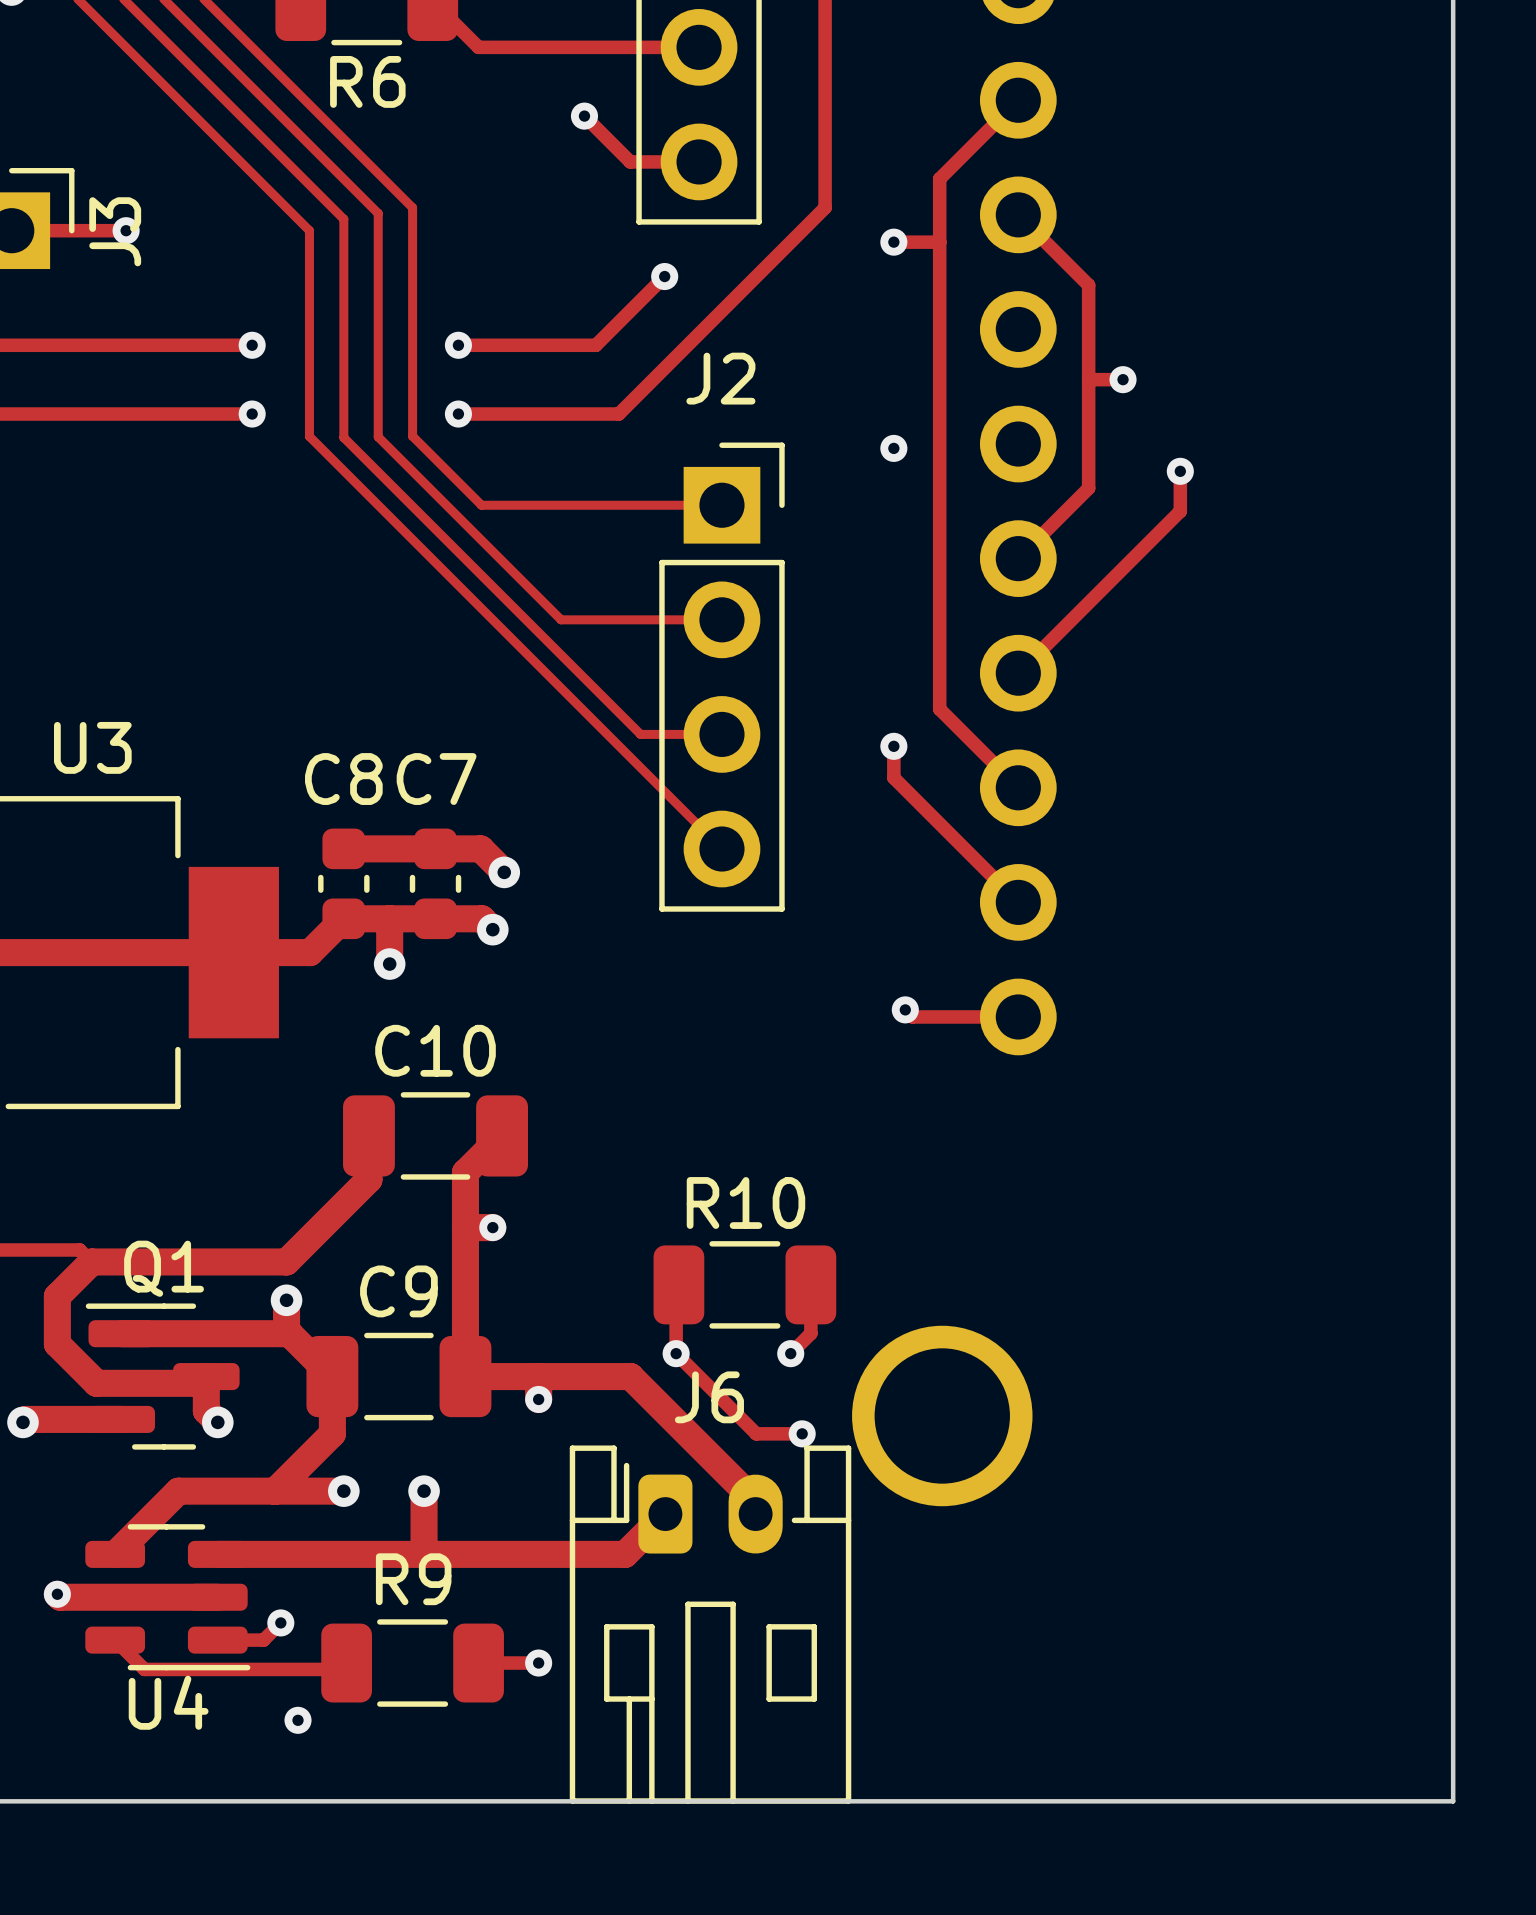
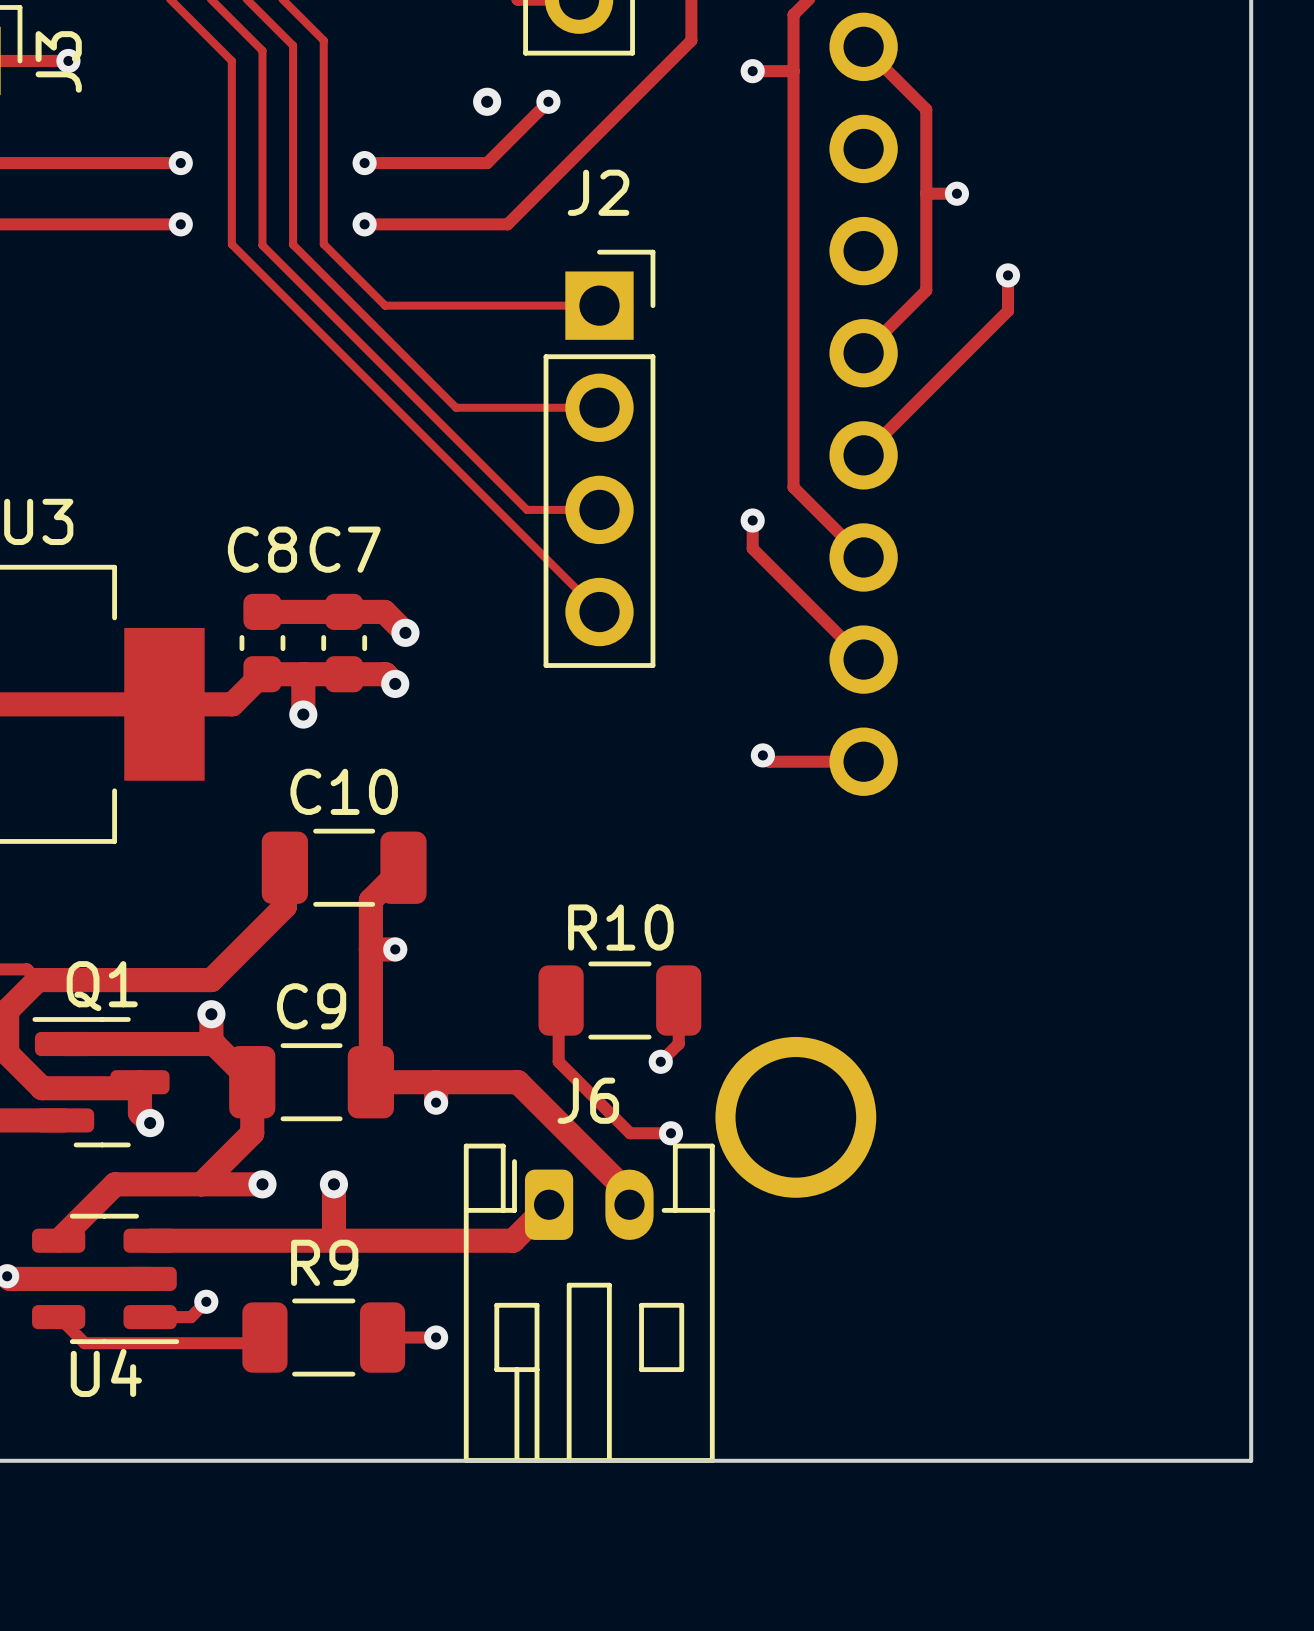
via: none -> (487, 101)
via: (893, 448) -> none
via: (676, 1353) -> none
via: (298, 1720) -> none

